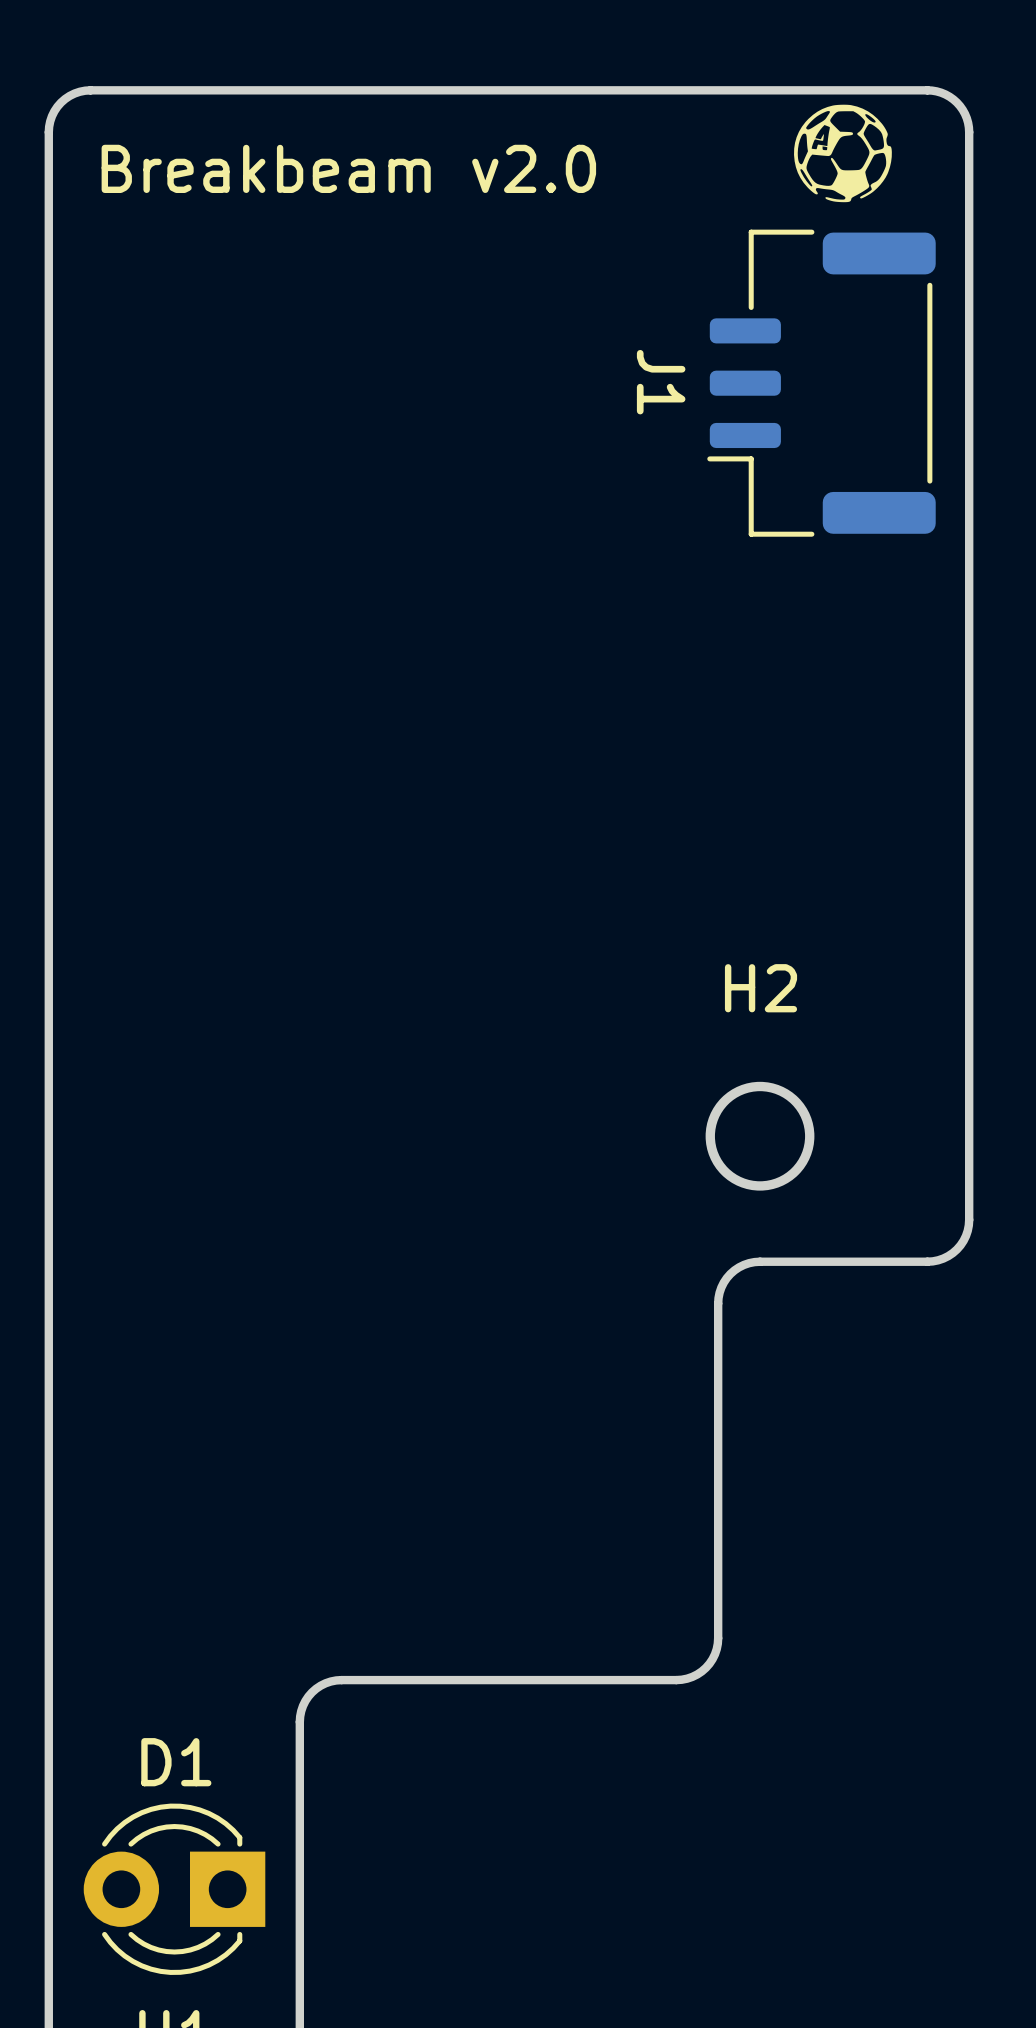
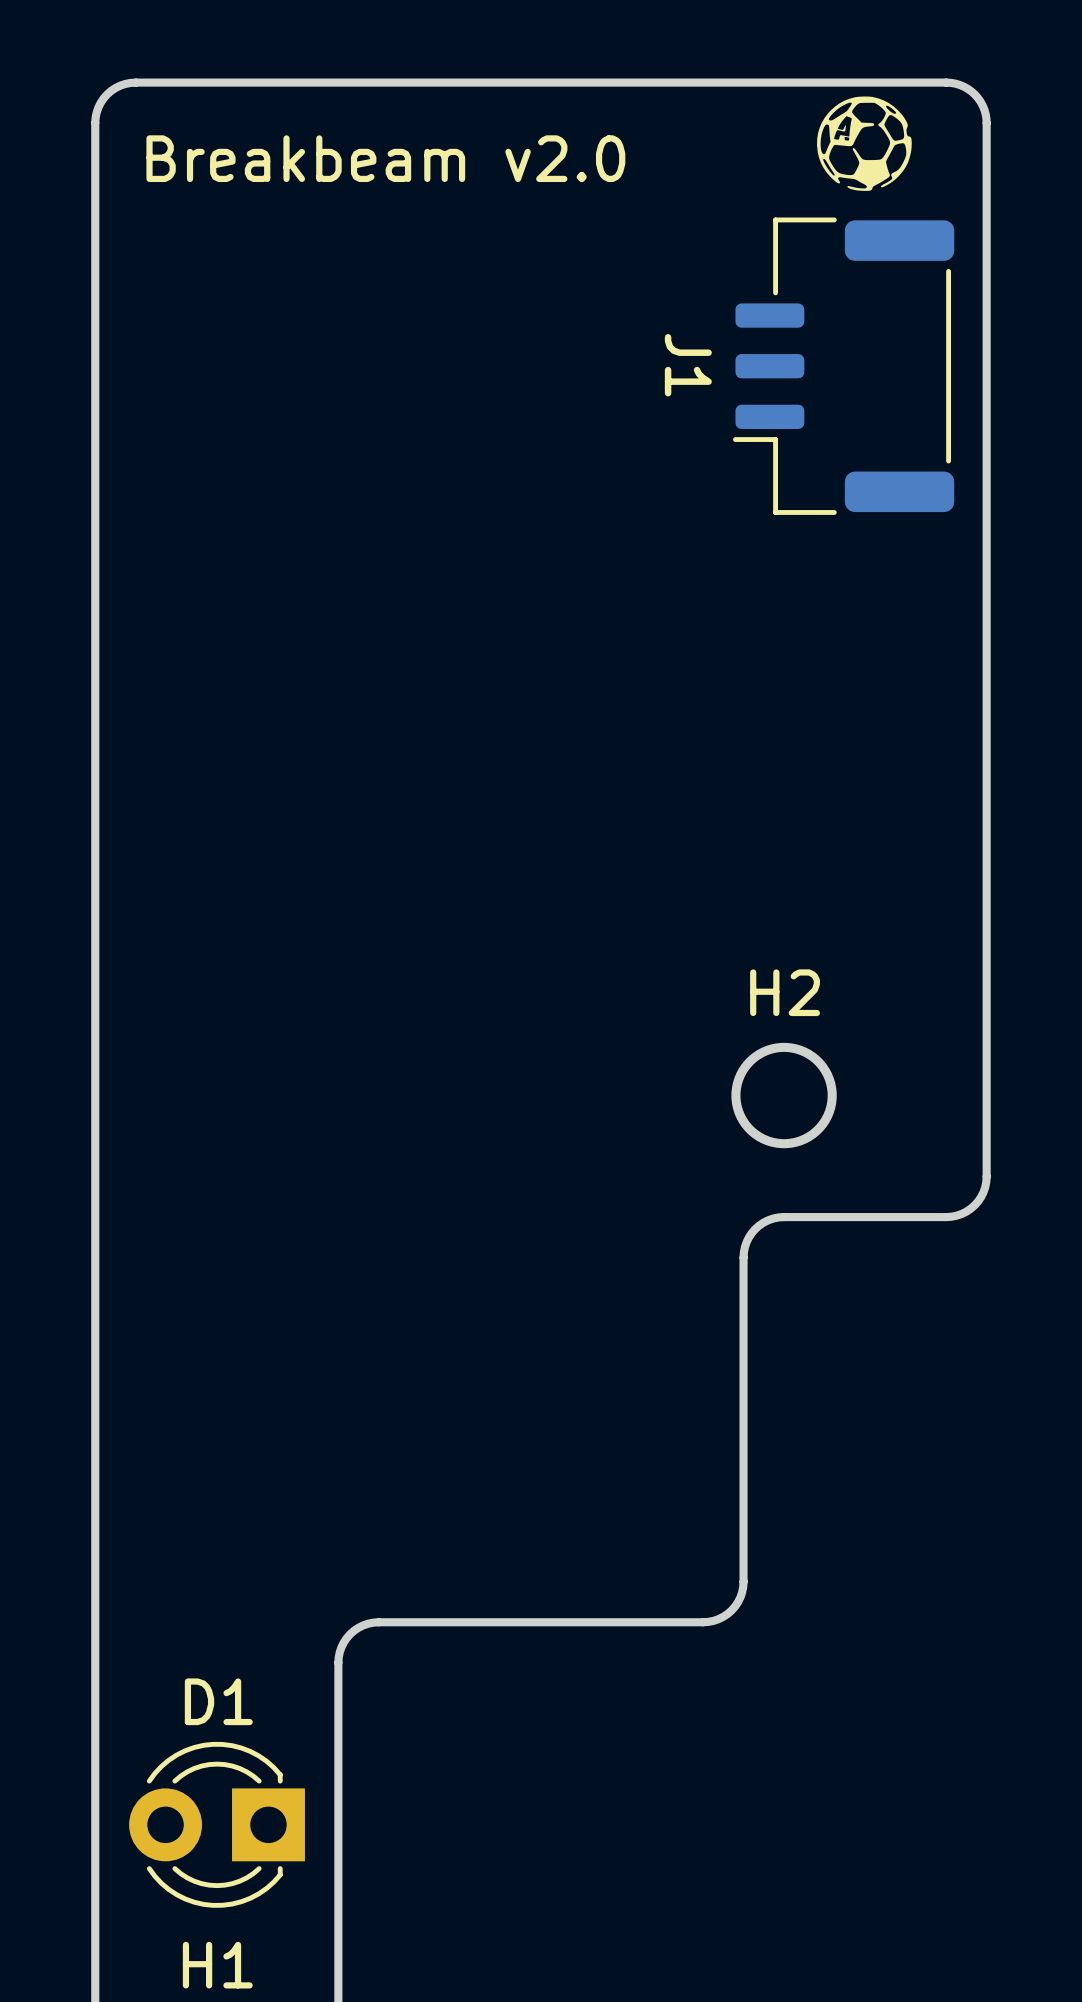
H2 name position: H2 (761, 988) -> H2 (785, 992)

